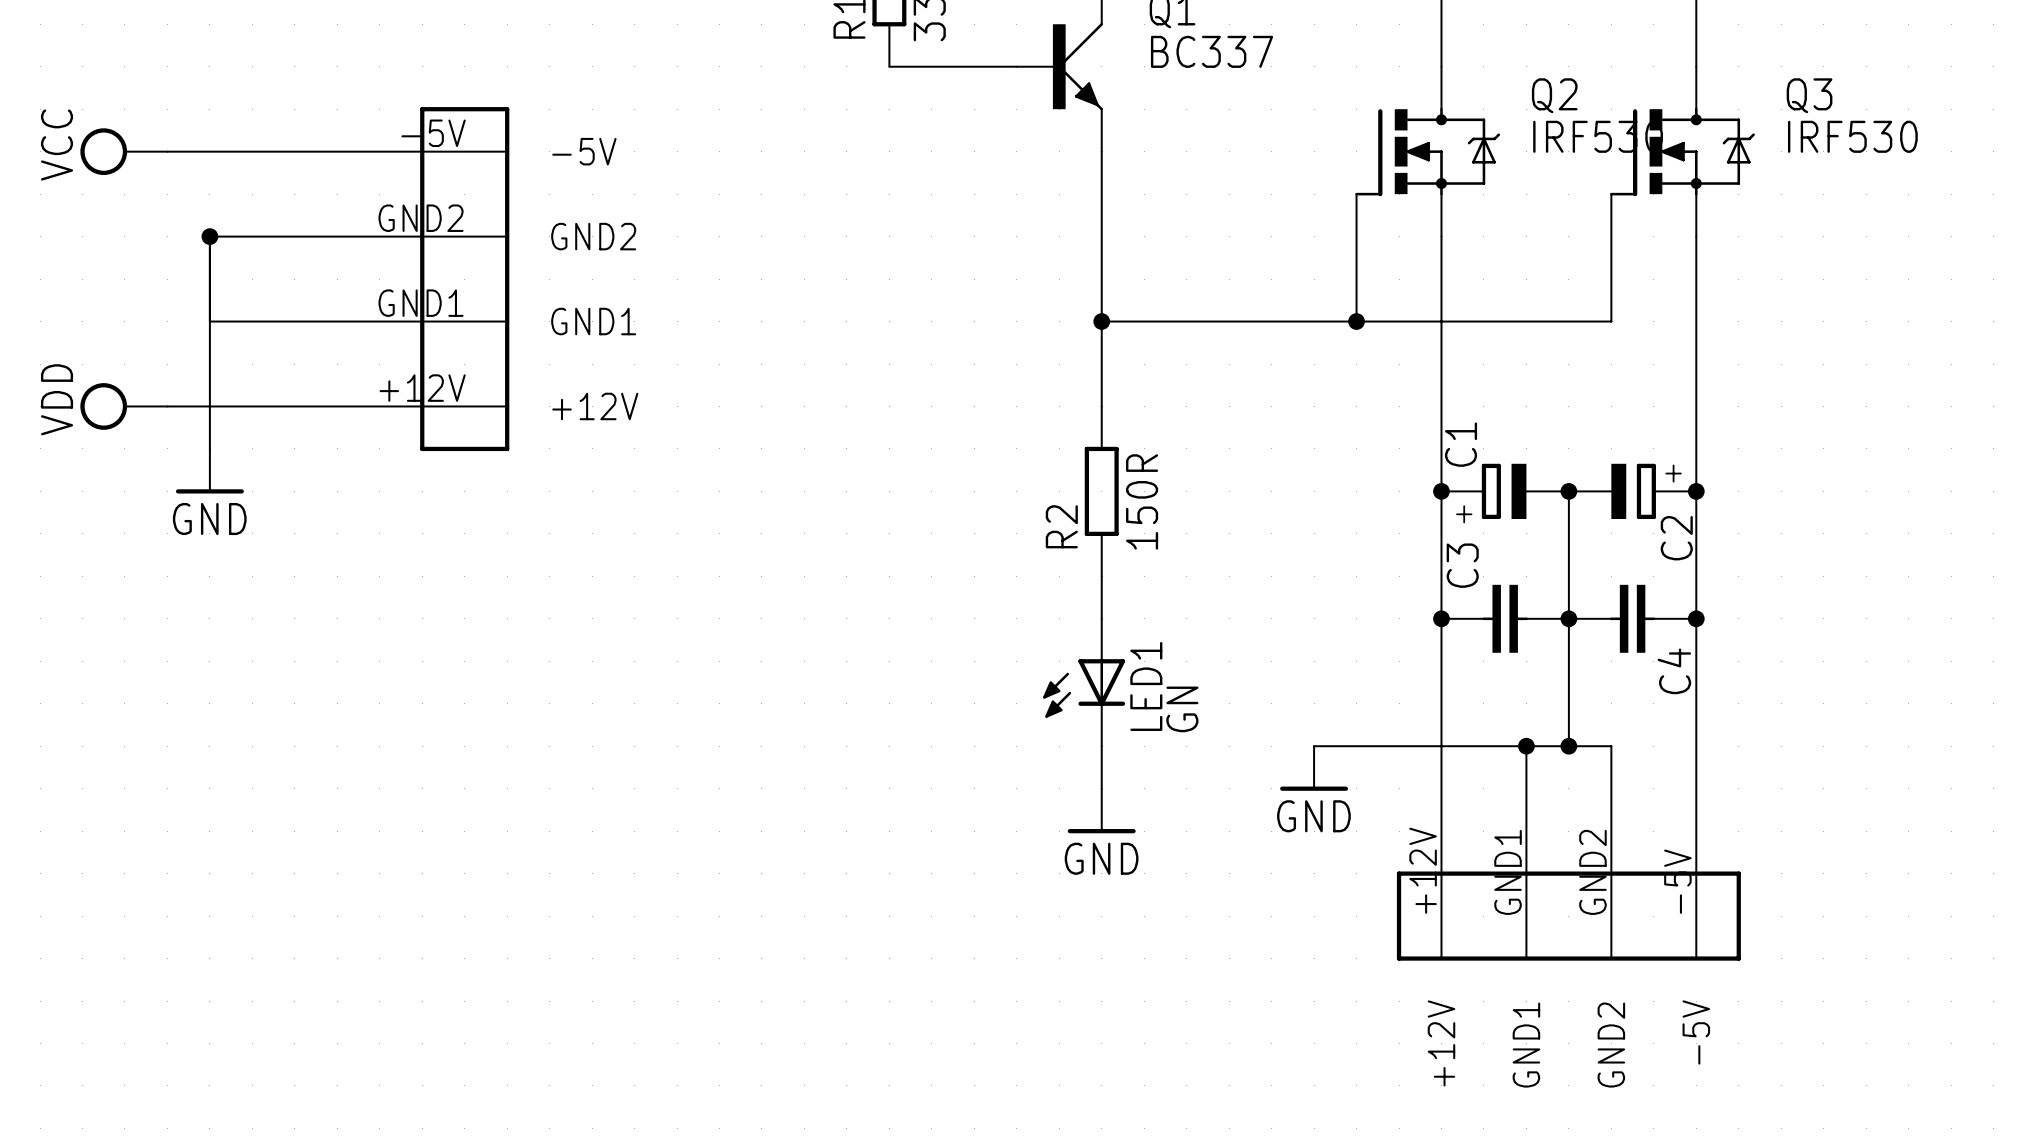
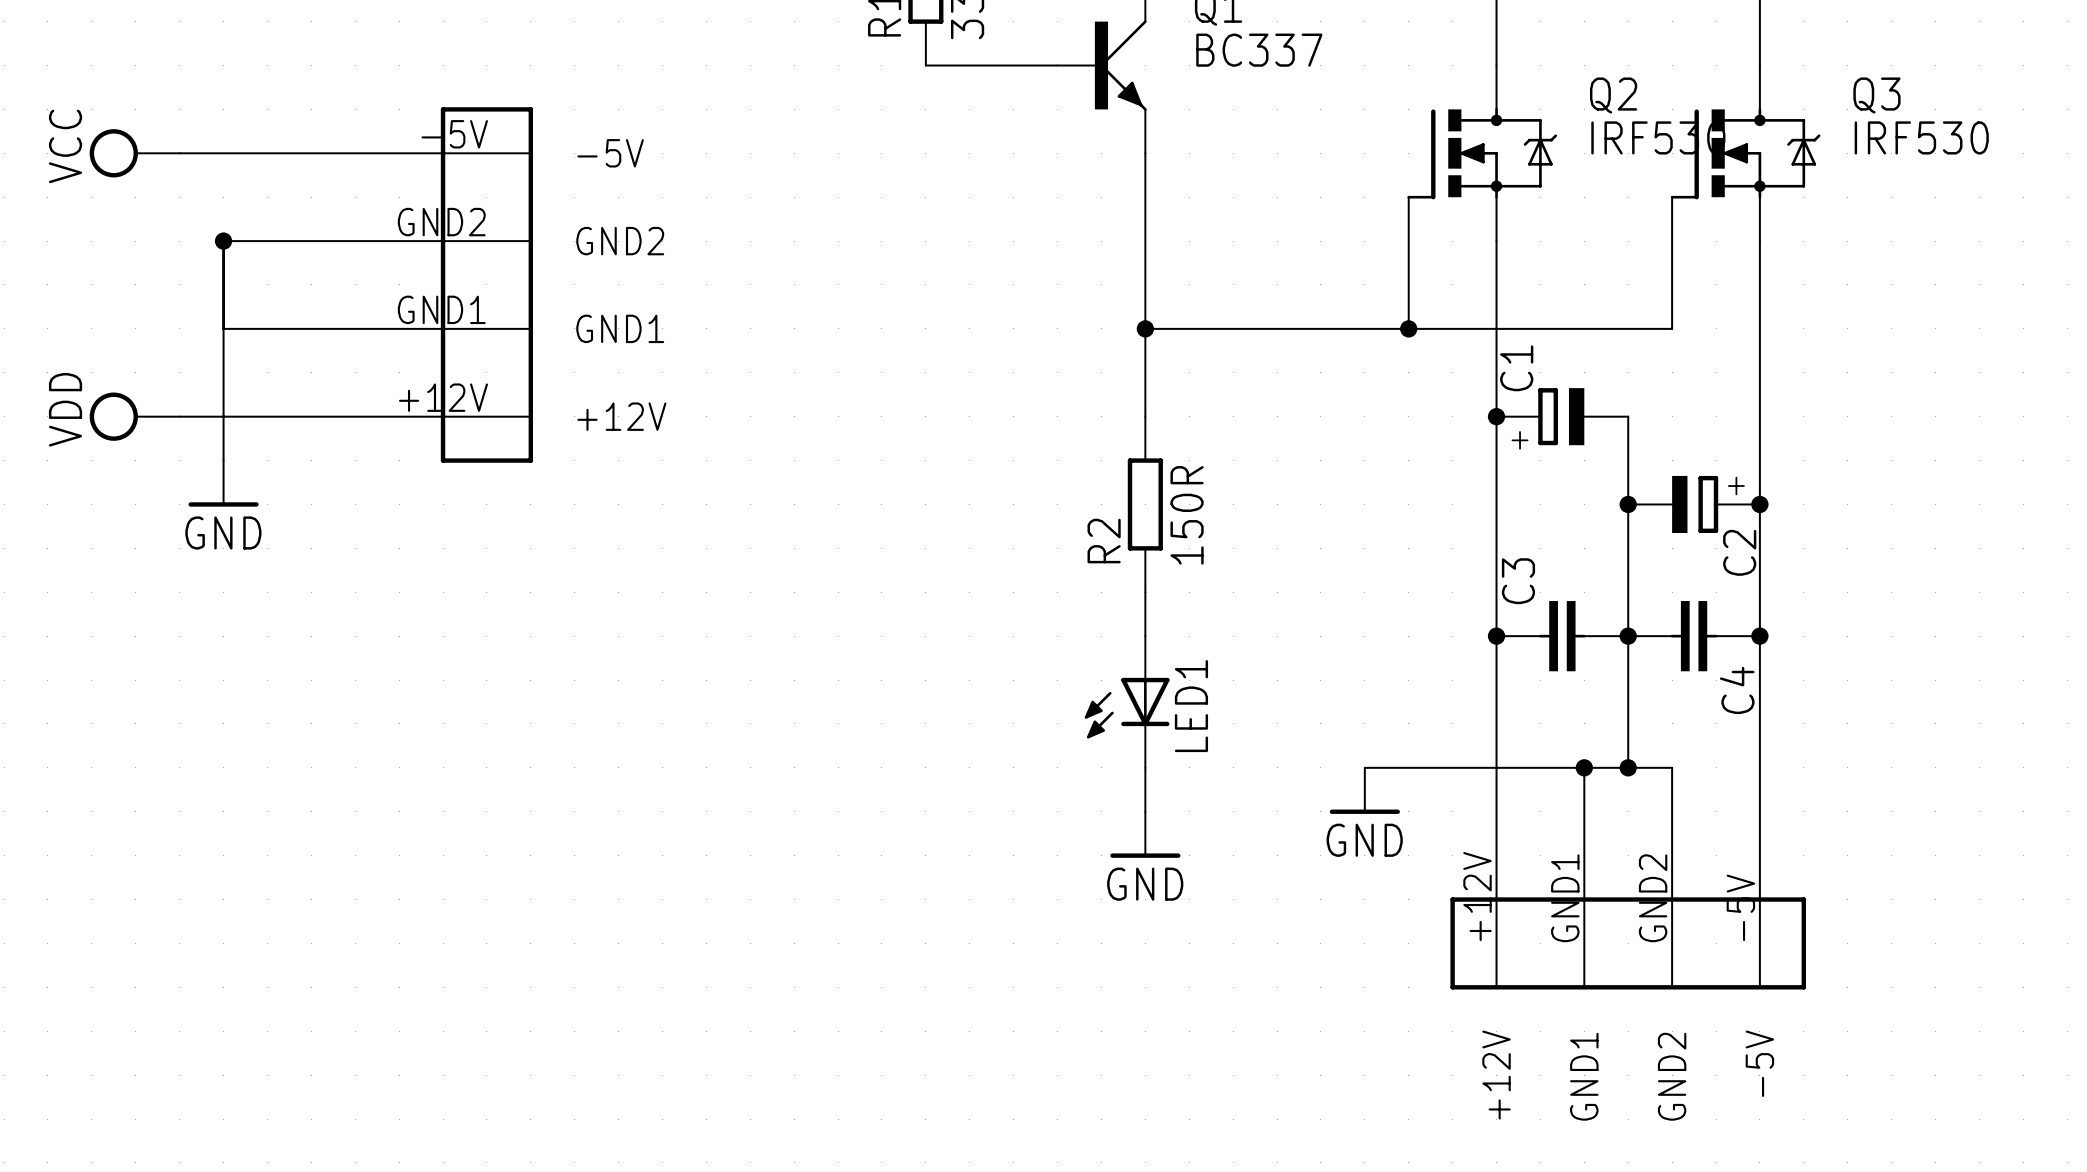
wire: none -> (1628, 416) (1628, 504)
junction position: (1441, 491) -> (1496, 416)
C1 position: (1505, 491) -> (1562, 416)
LED1 value: GN (1182, 709) -> none

